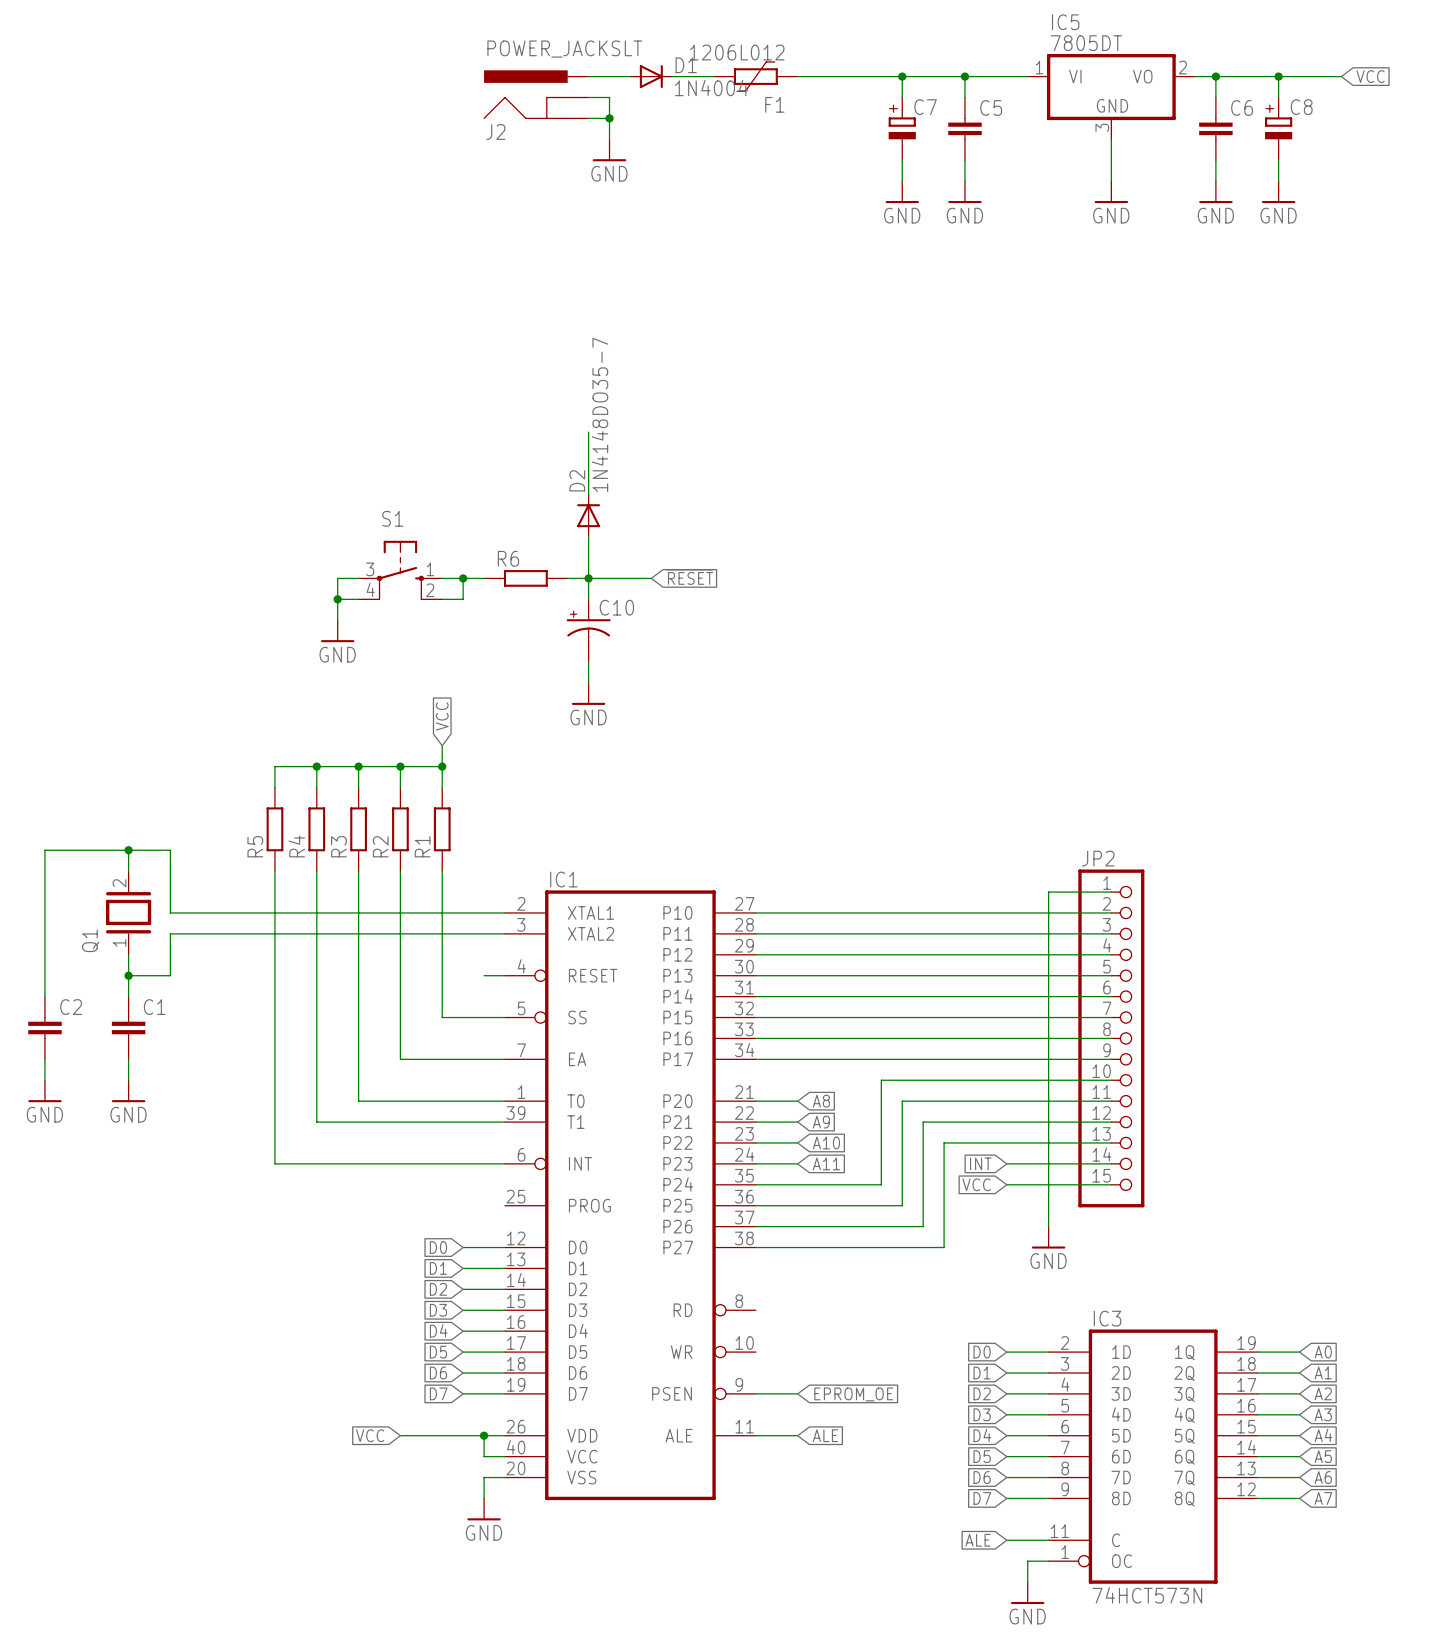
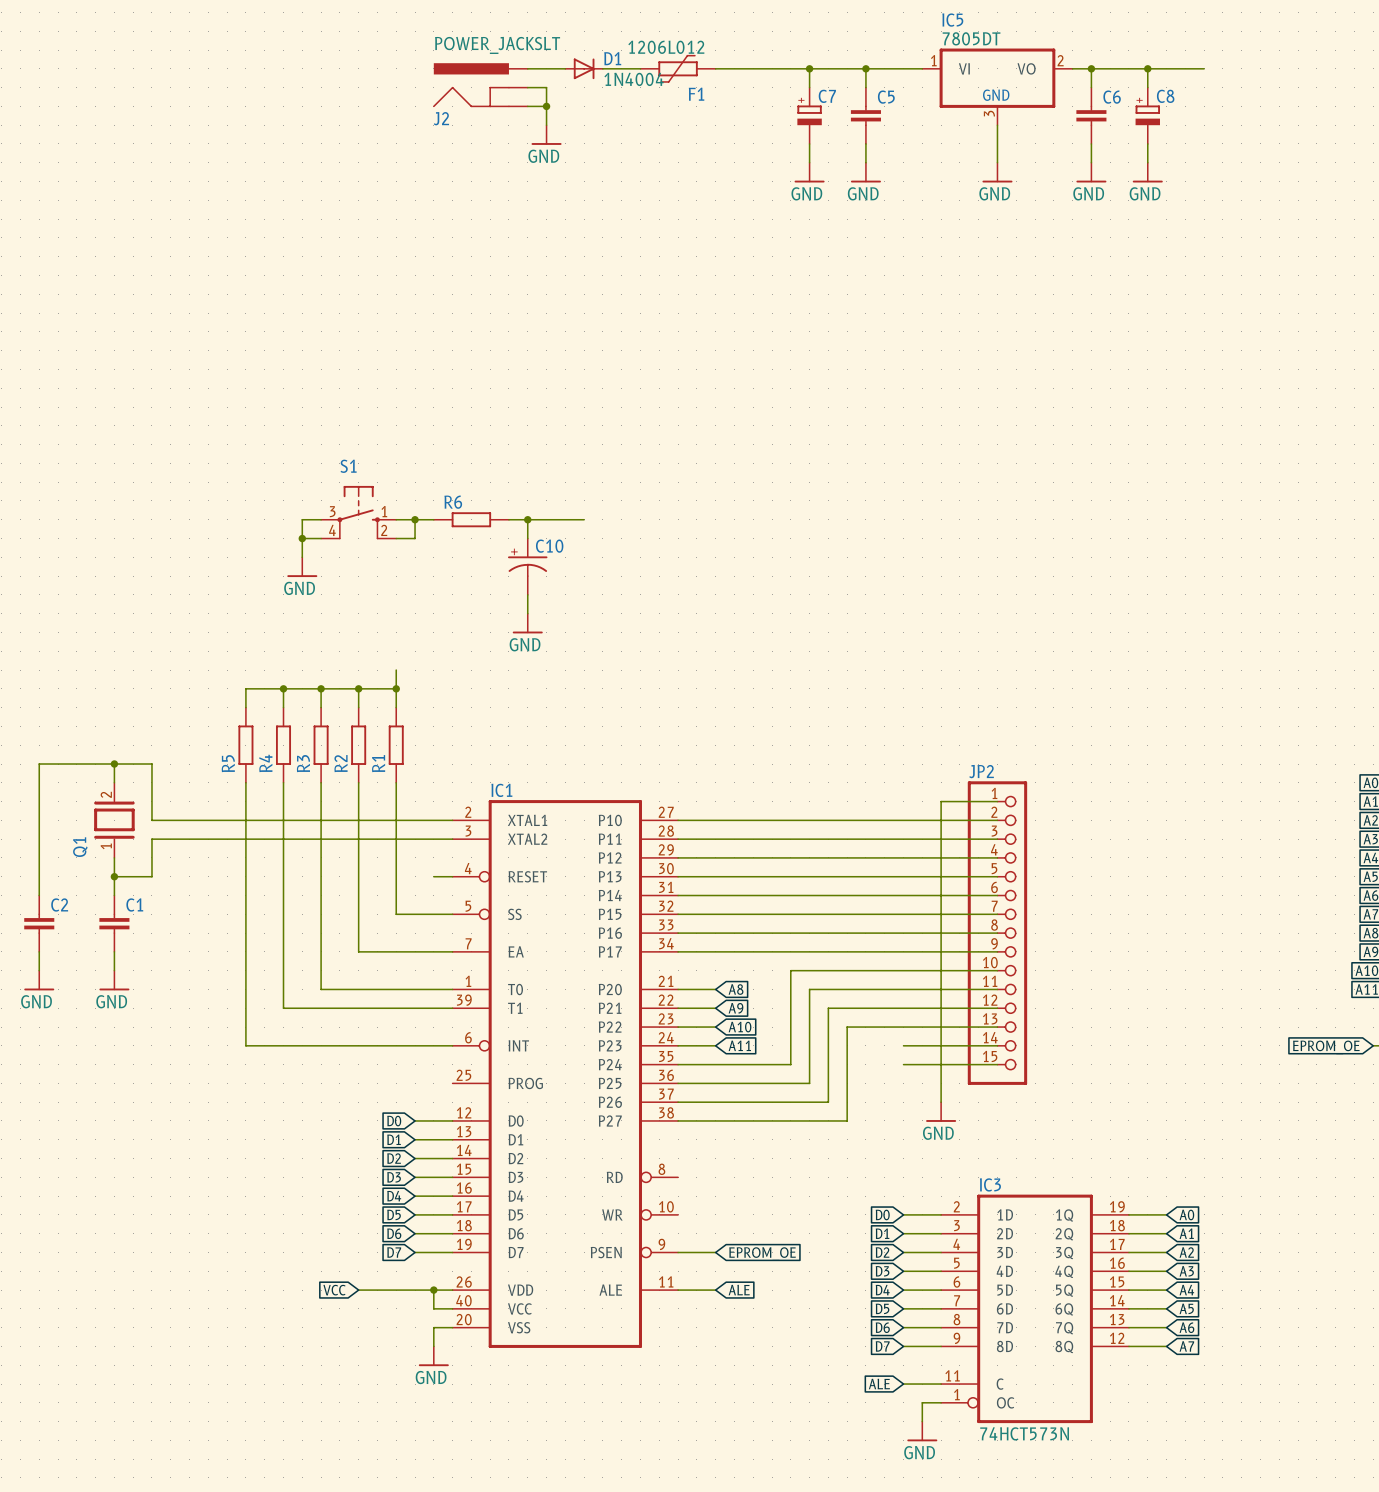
global label: VCC (1370, 76) -> none
wire: (588, 432) (588, 494) -> none
D2: 1N4148DO35-7 (588, 515) -> none
wire: (588, 536) (588, 578) -> none
global label: ~{RESET} (689, 577) -> none
global label: VCC (442, 716) -> none
global label: INT (980, 1163) -> none
global label: VCC (976, 1184) -> none

